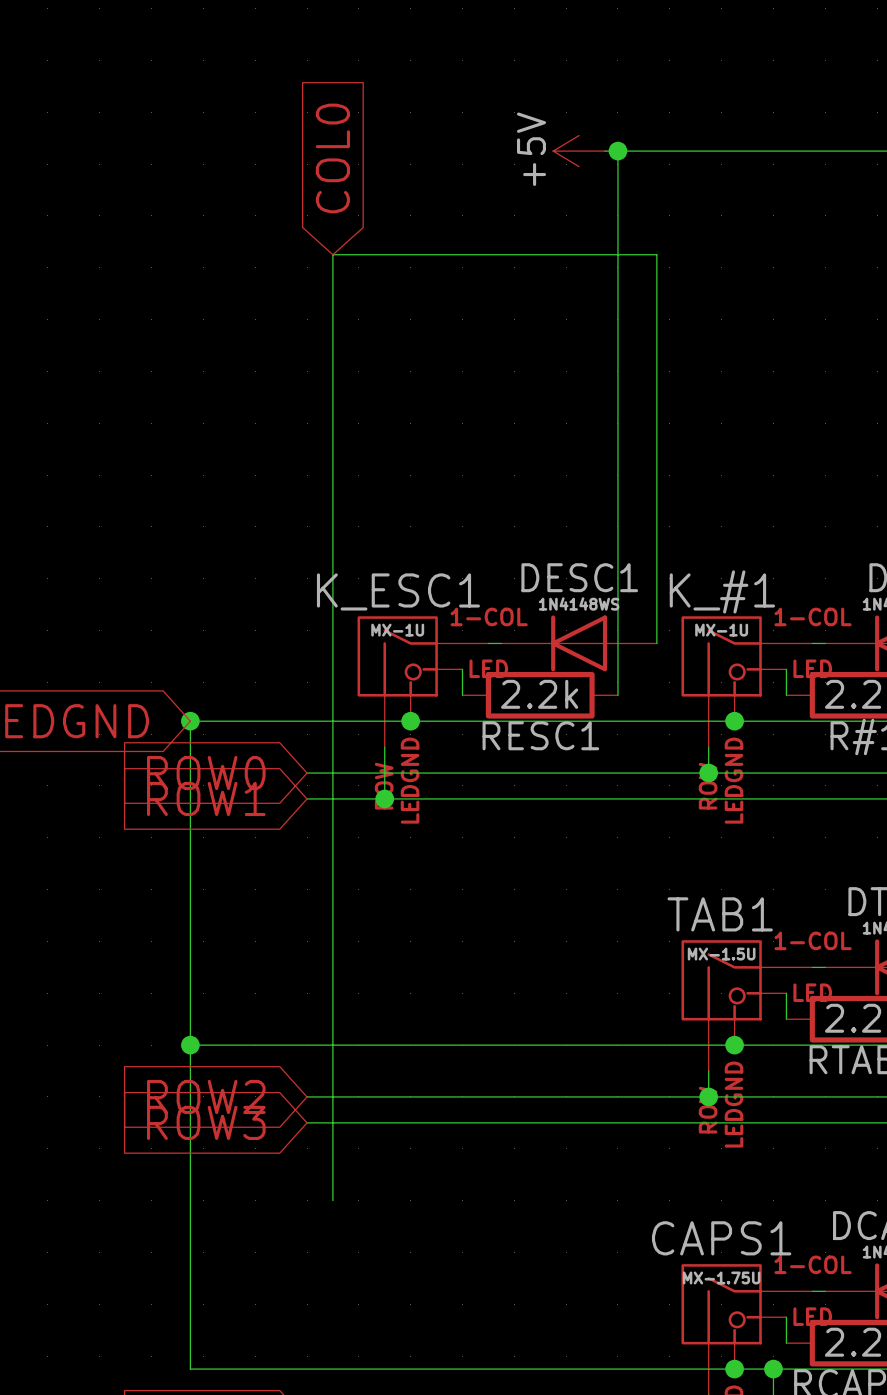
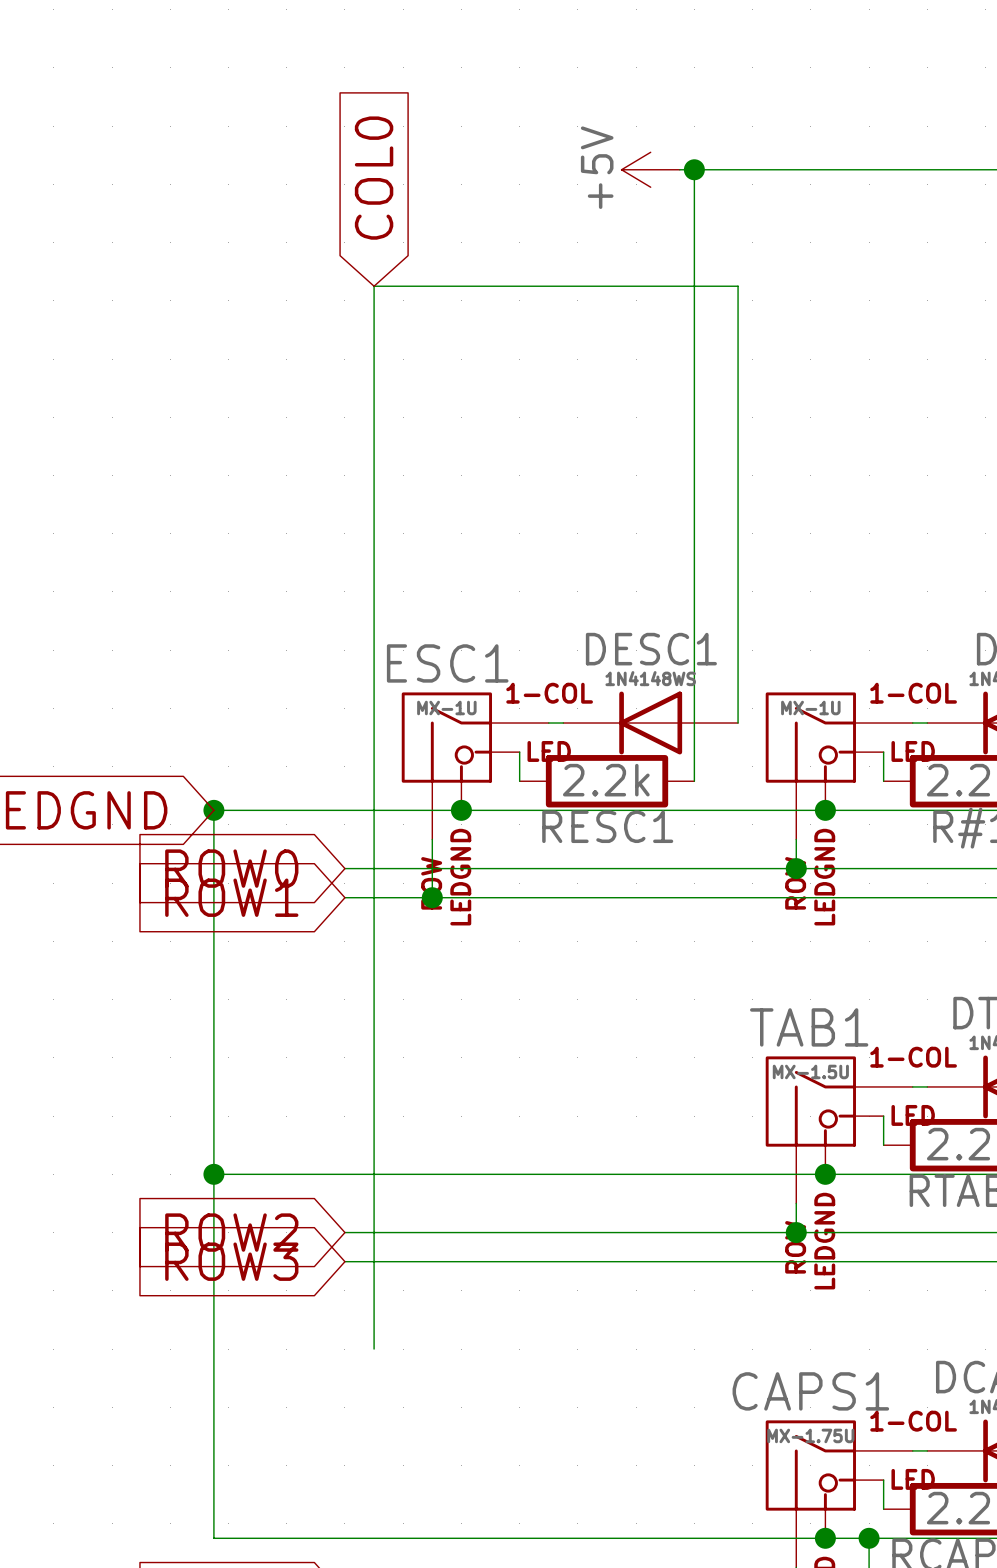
K_ESC1 name: K_ESC1 (398, 591) -> ESC1 (447, 663)
K_#1: MX-1U (746, 681) -> none

